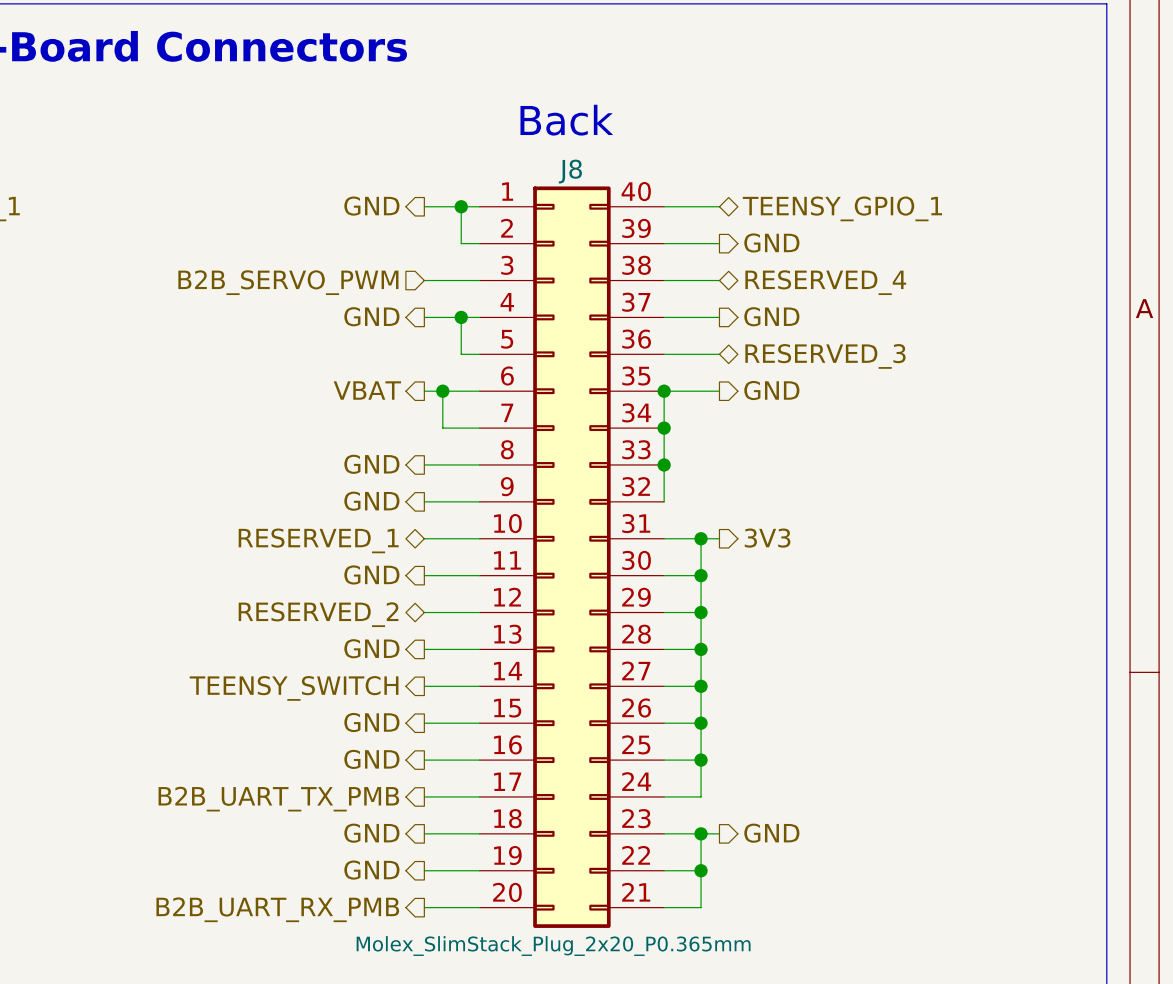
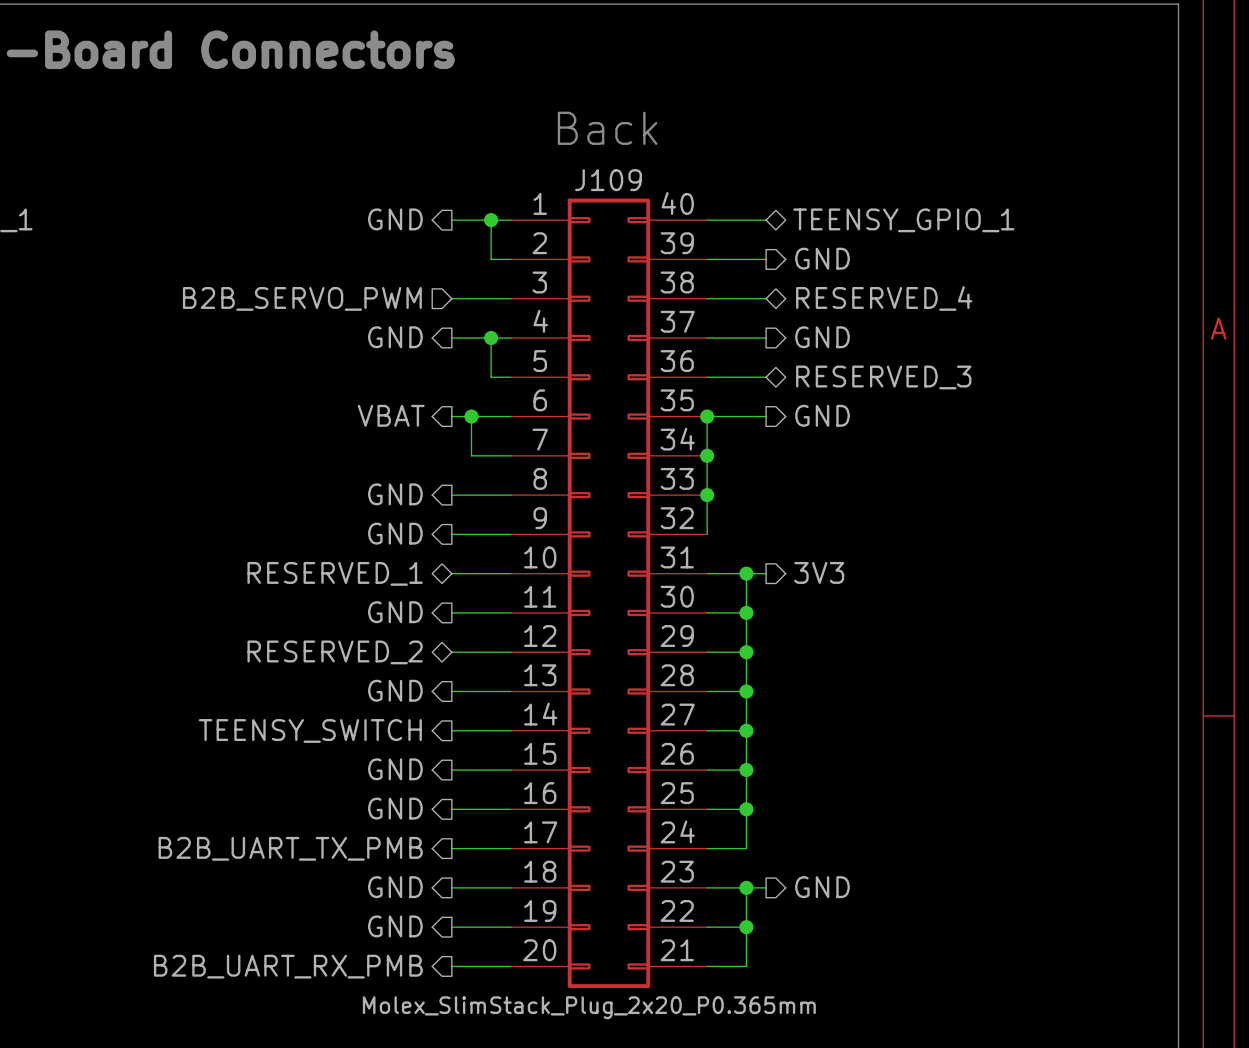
J8 name: J8 (570, 171) -> J109 (608, 180)

